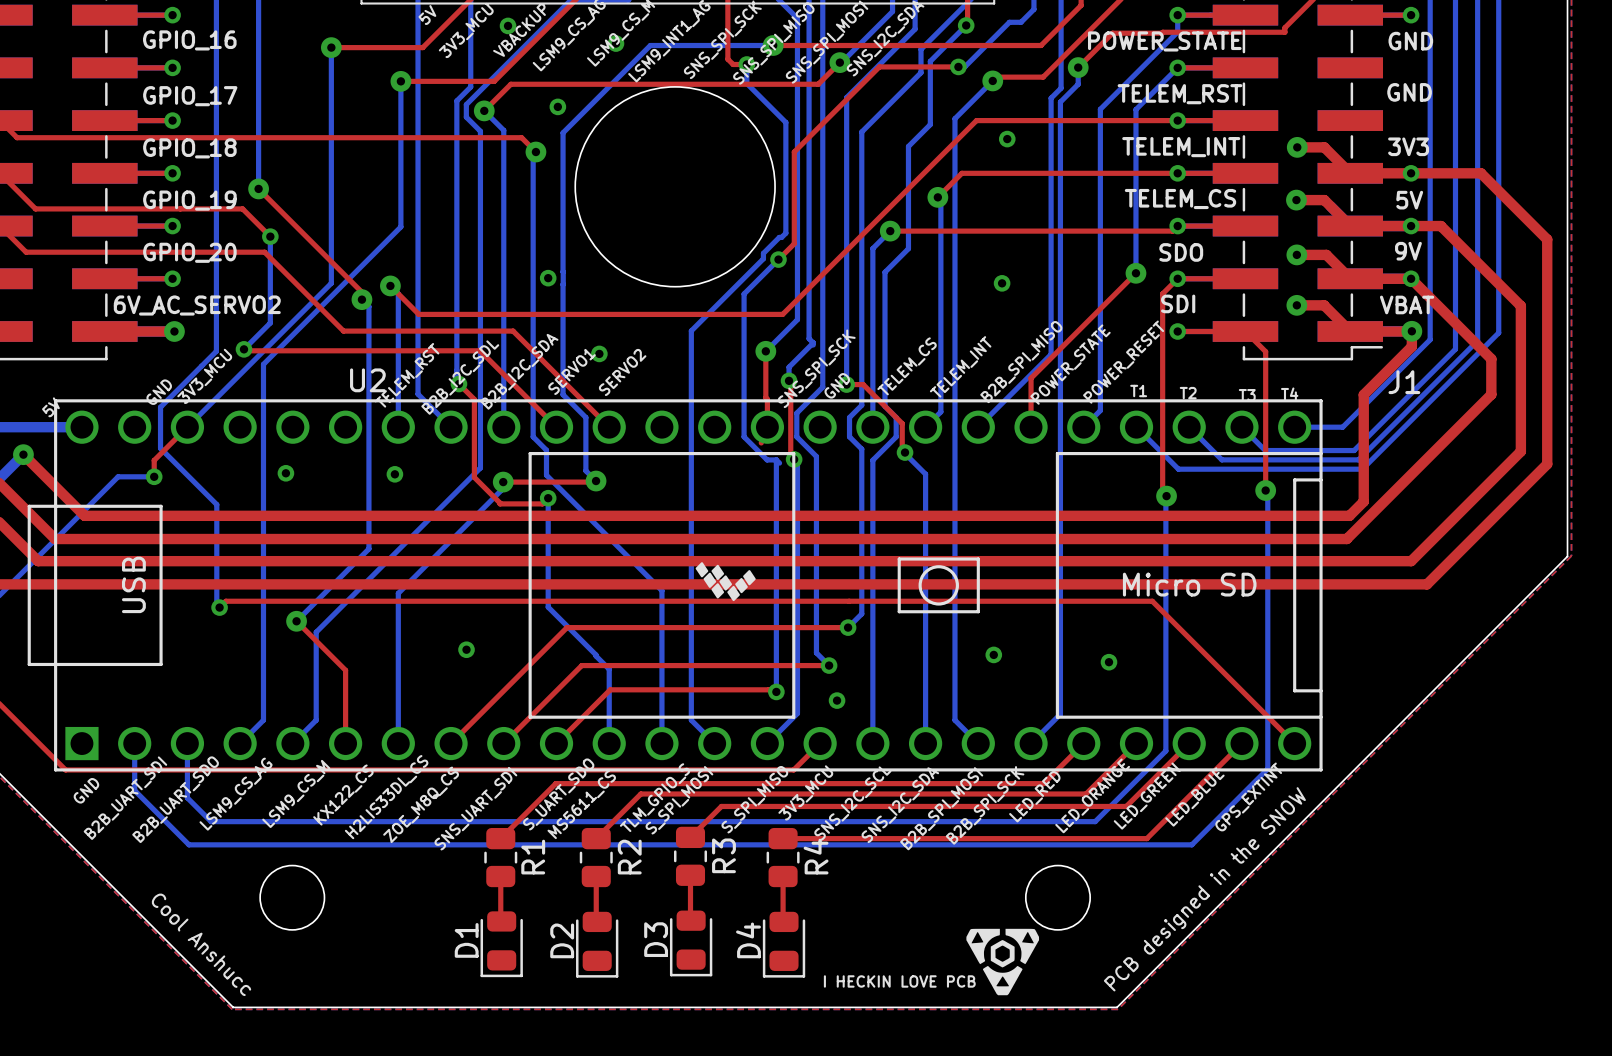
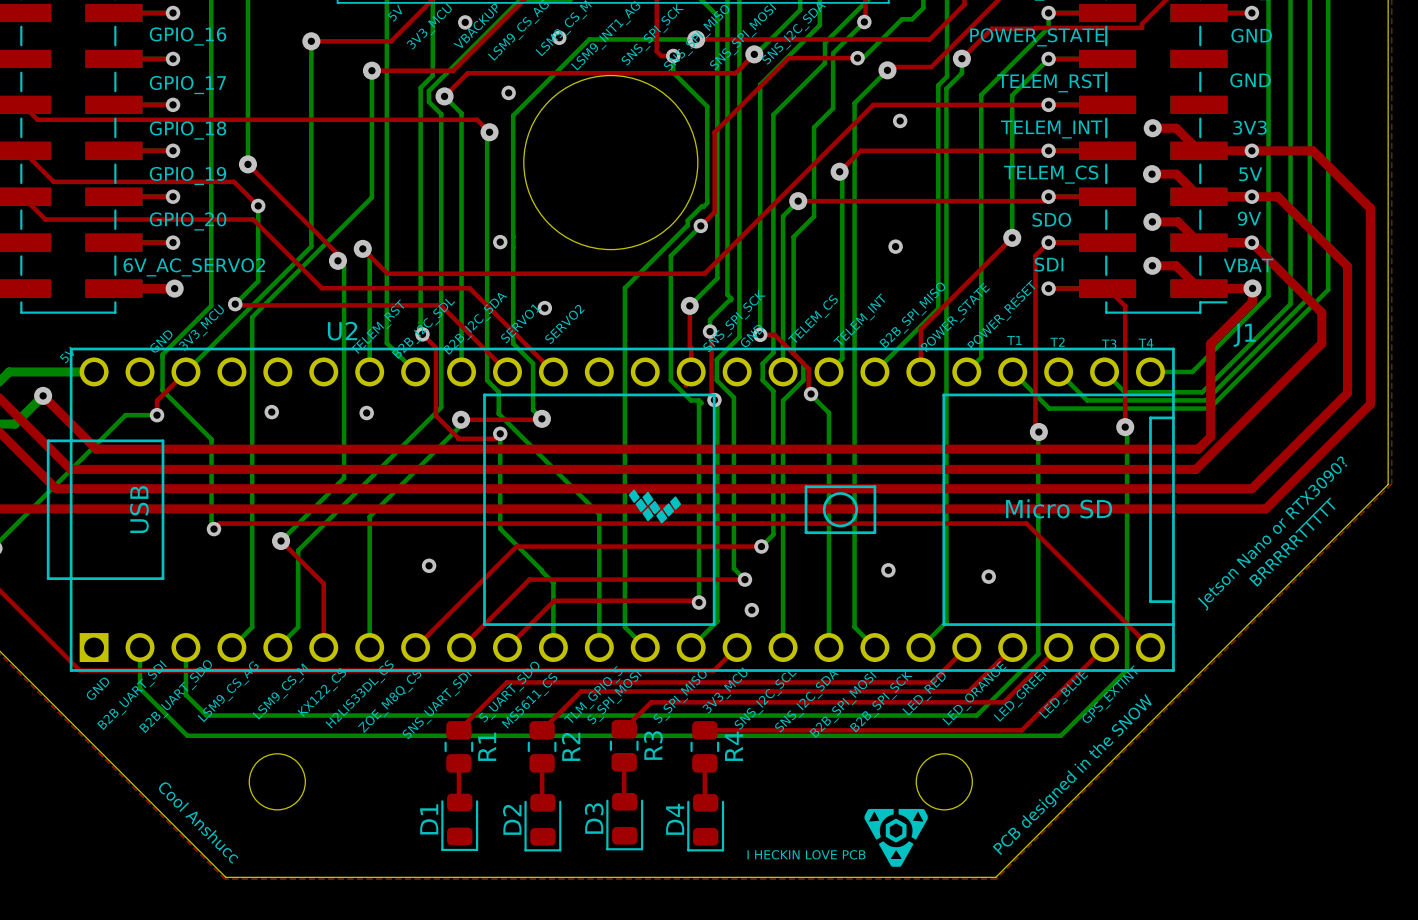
text: none -> Jetson Nano or RTX3090? (1272, 533)
text: none -> BRRRRRTTTTT (1292, 542)

